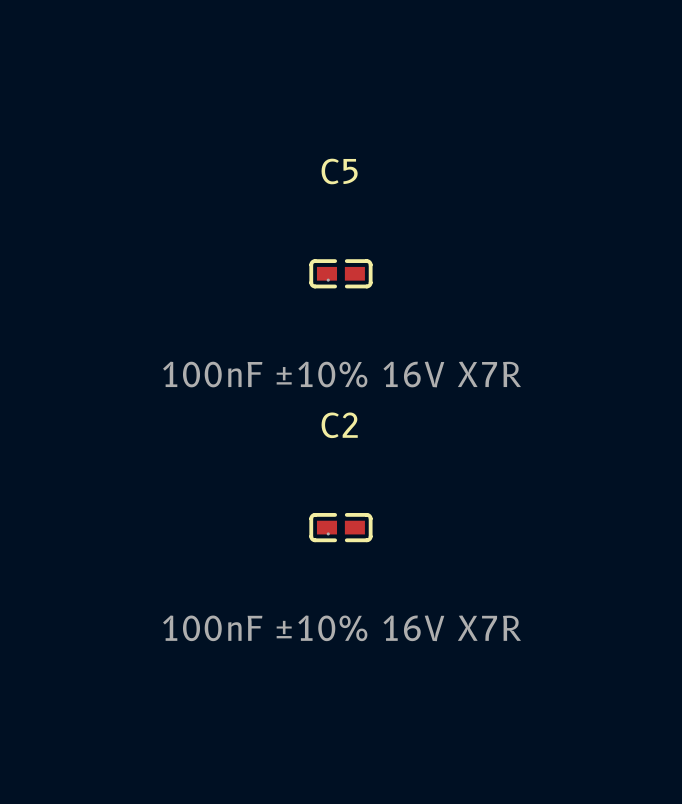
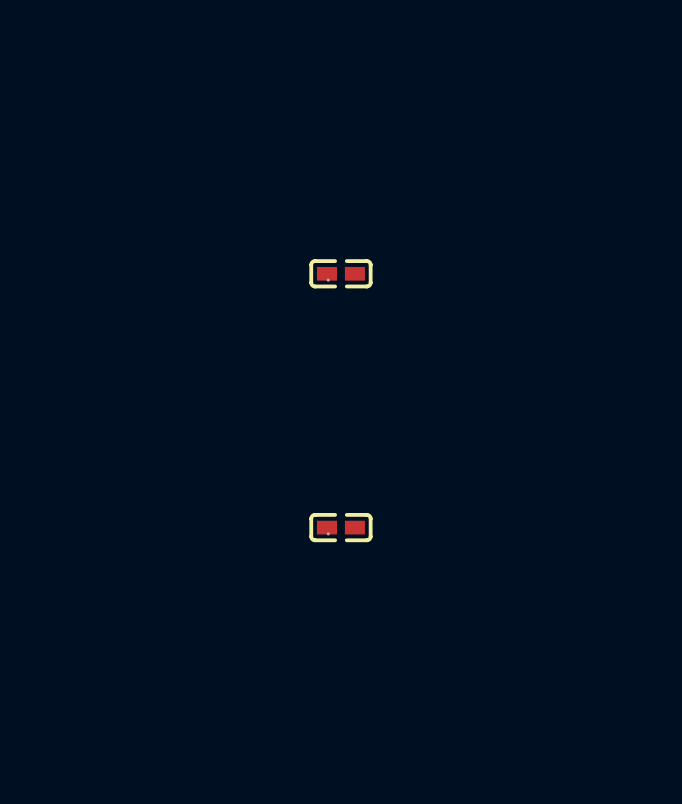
C5 name: C5 (339, 171) -> none
C5 value: 100nF ±10% 16V X7R (342, 374) -> none
C2 name: C2 (339, 425) -> none
C2 value: 100nF ±10% 16V X7R (342, 628) -> none

